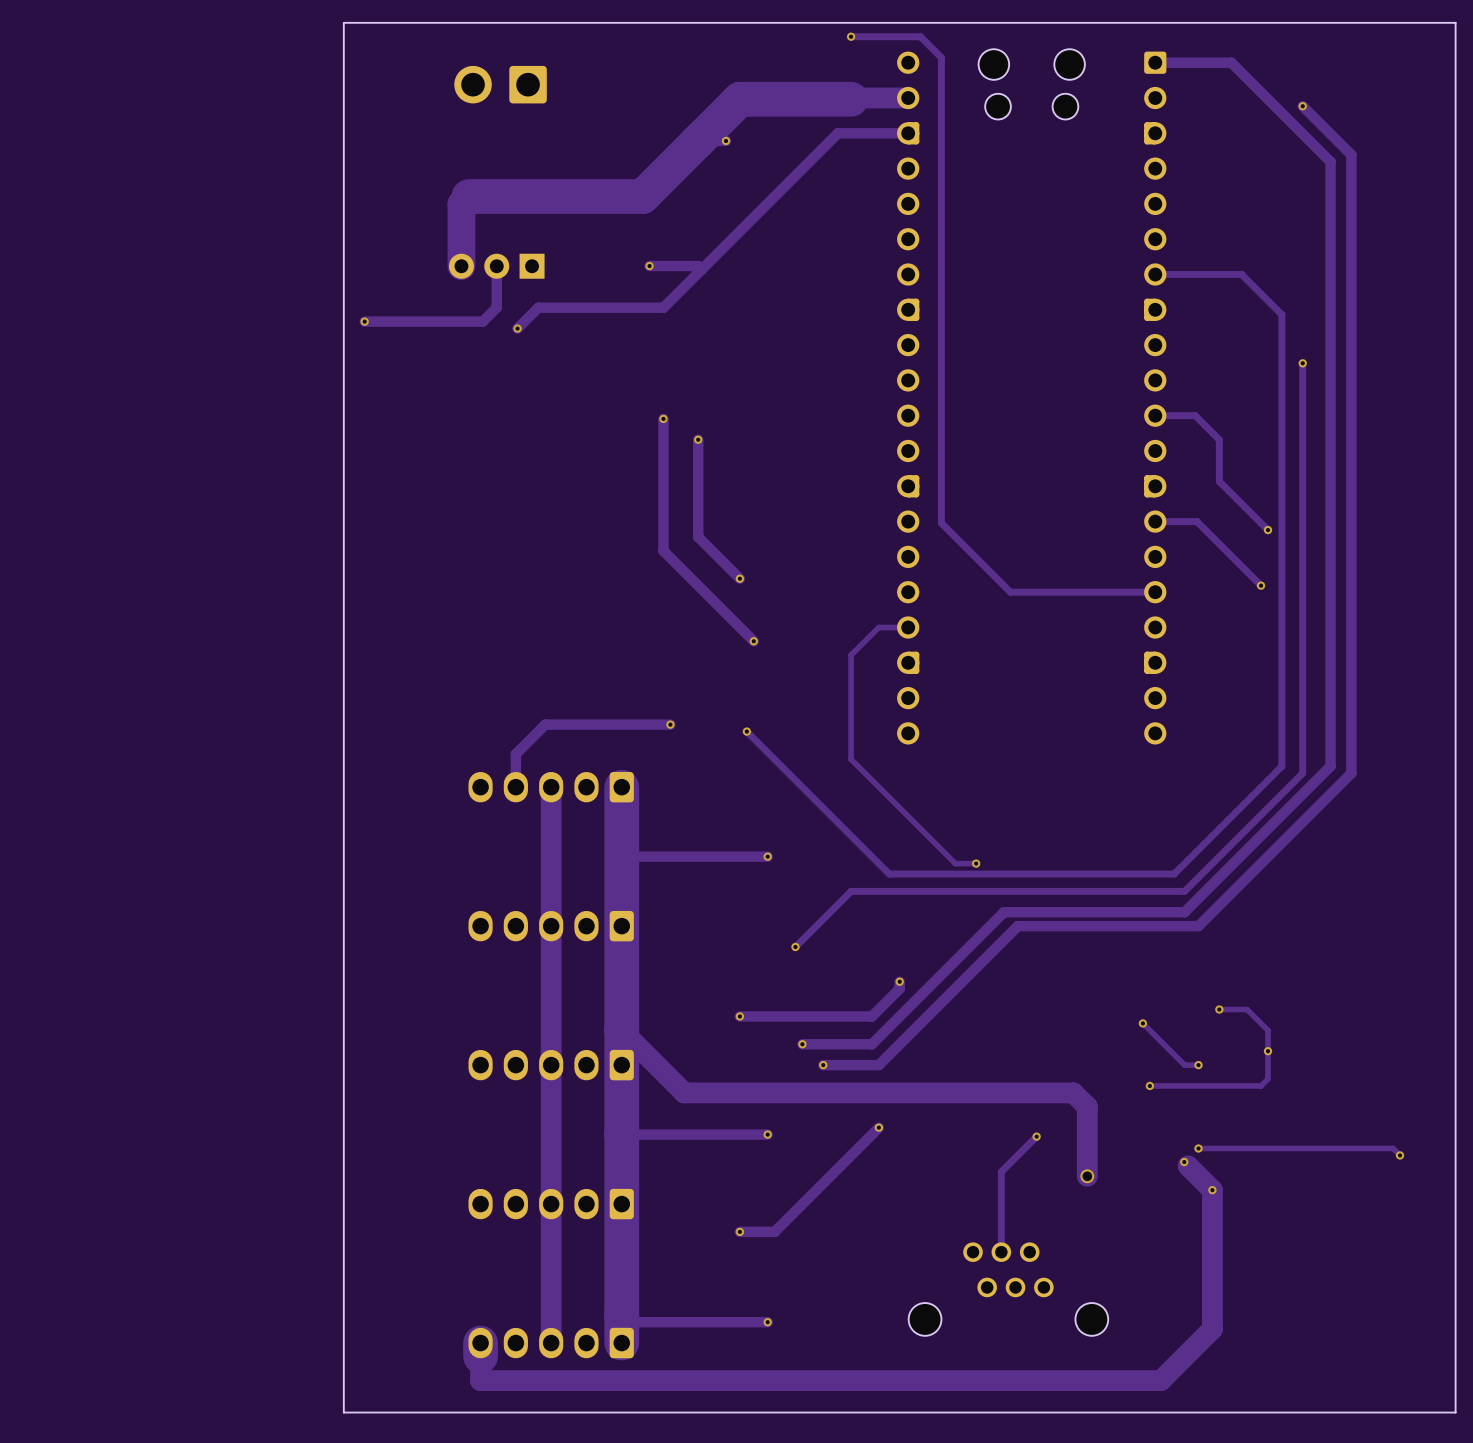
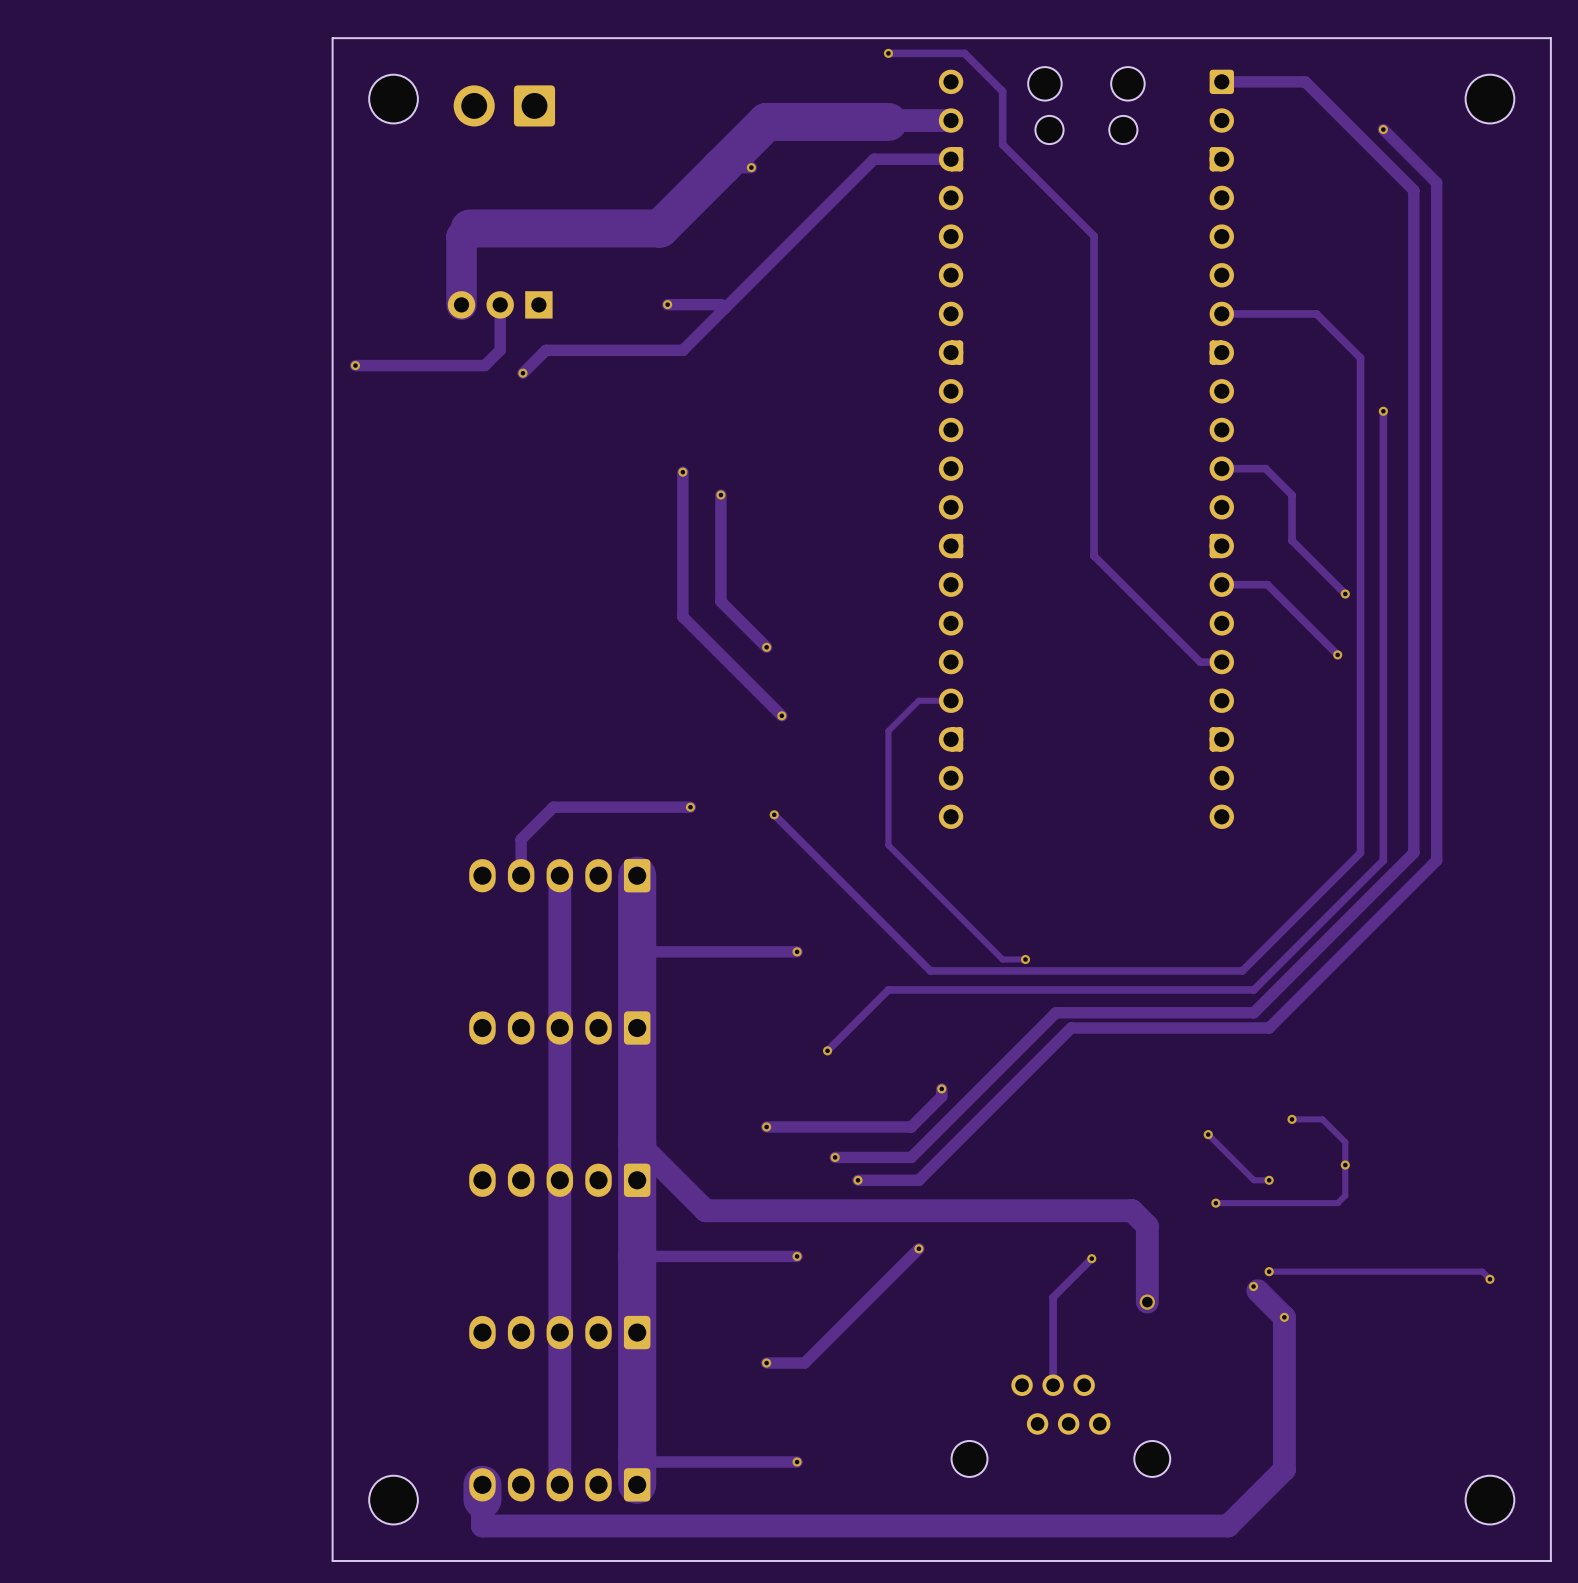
track: (941, 57) (941, 523) (1010, 592) (1135, 592) -> (987, 76) (1002, 91) (1002, 144) (1094, 236) (1094, 555) (1200, 662)
part: none -> (393, 99)
part: none -> (1489, 99)
part: none -> (393, 1500)
part: none -> (1489, 1500)

